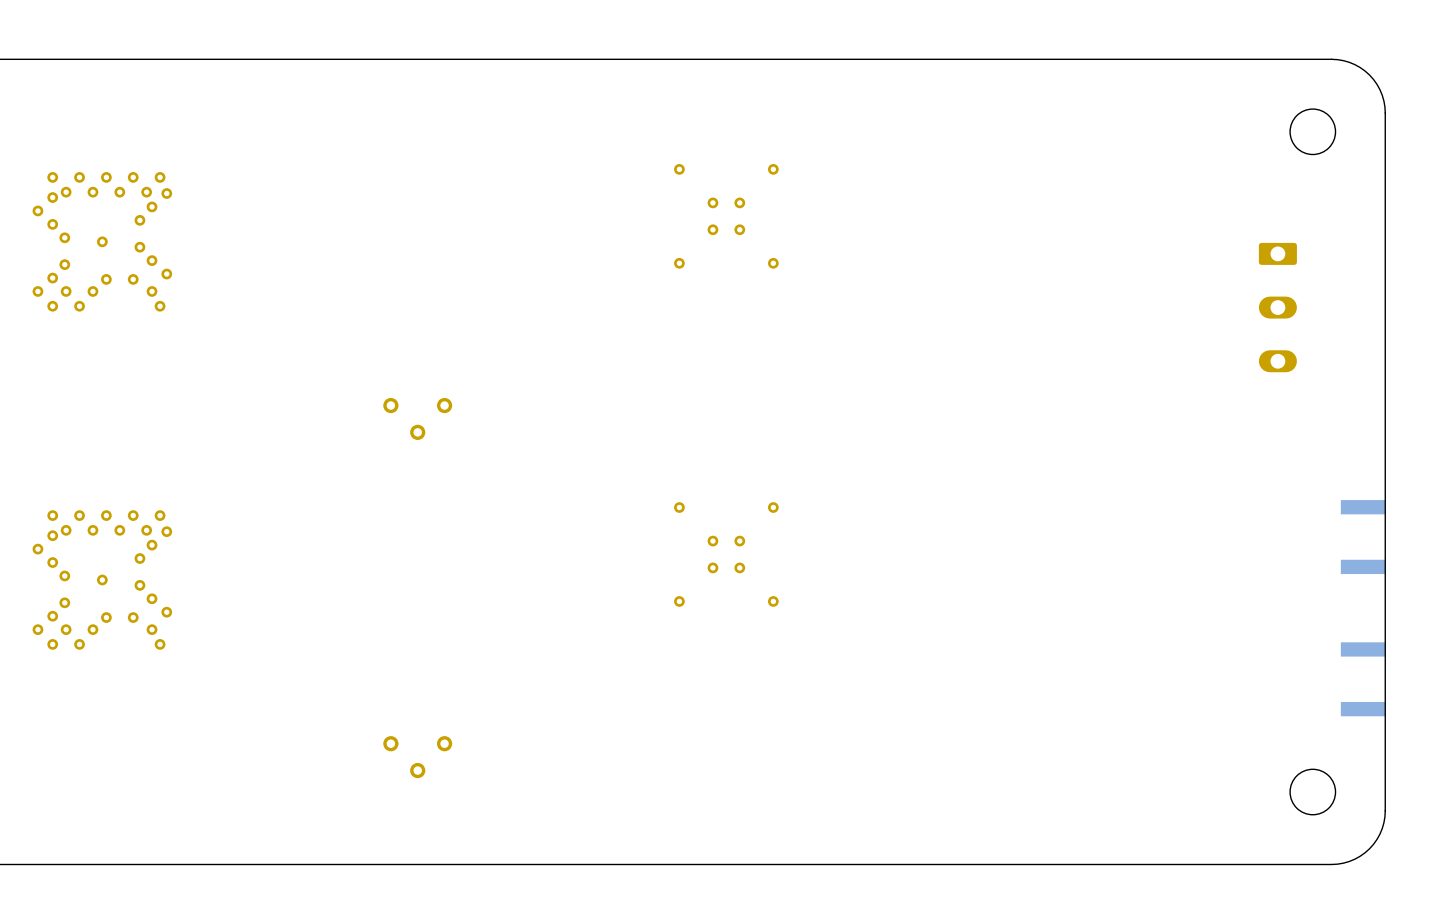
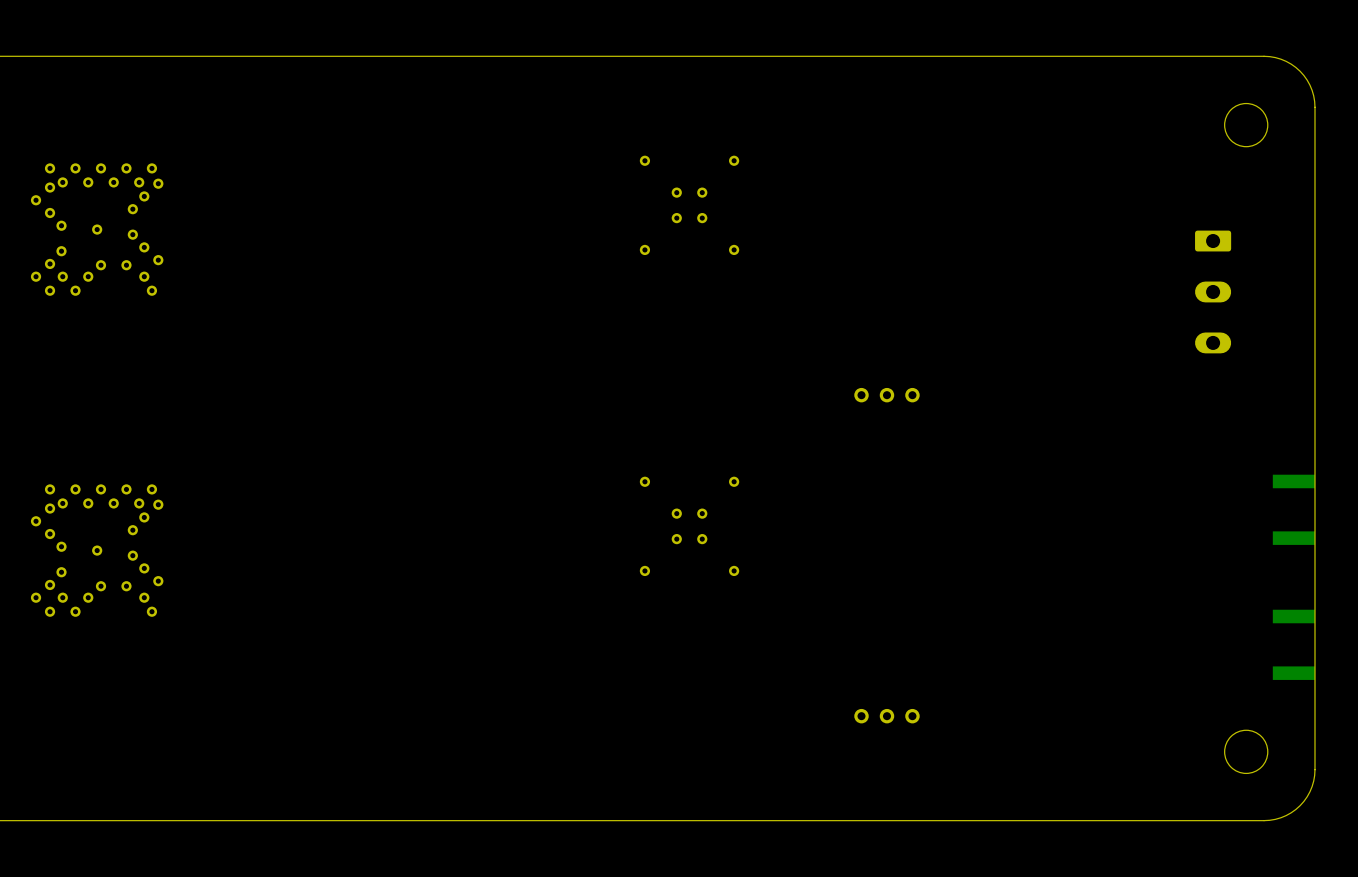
part: none -> (886, 395)
part: (417, 418) -> none
part: none -> (886, 716)
part: (417, 757) -> none

